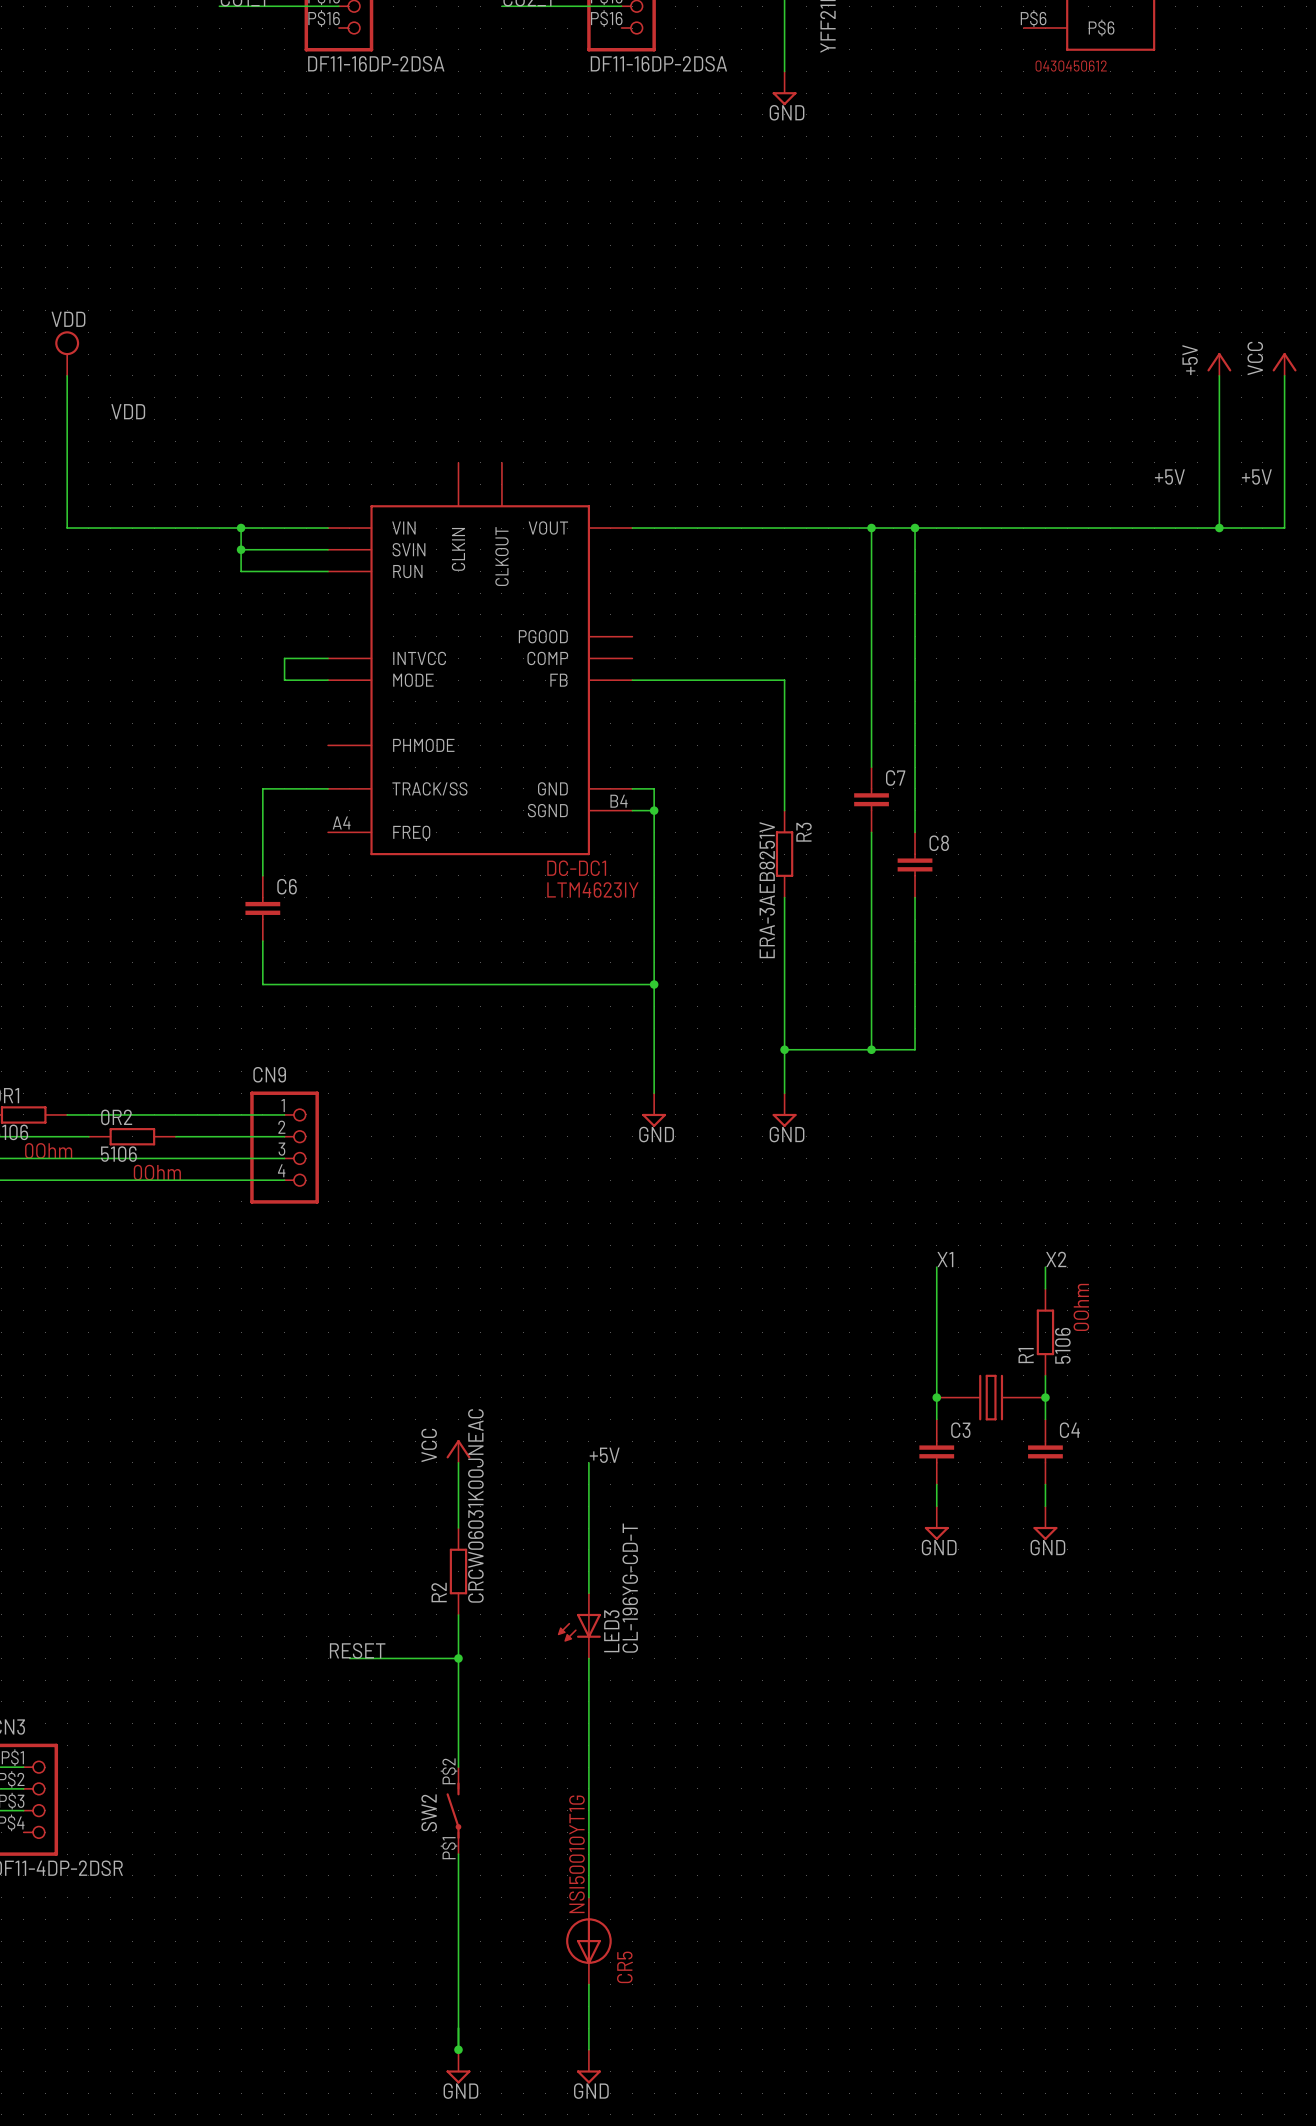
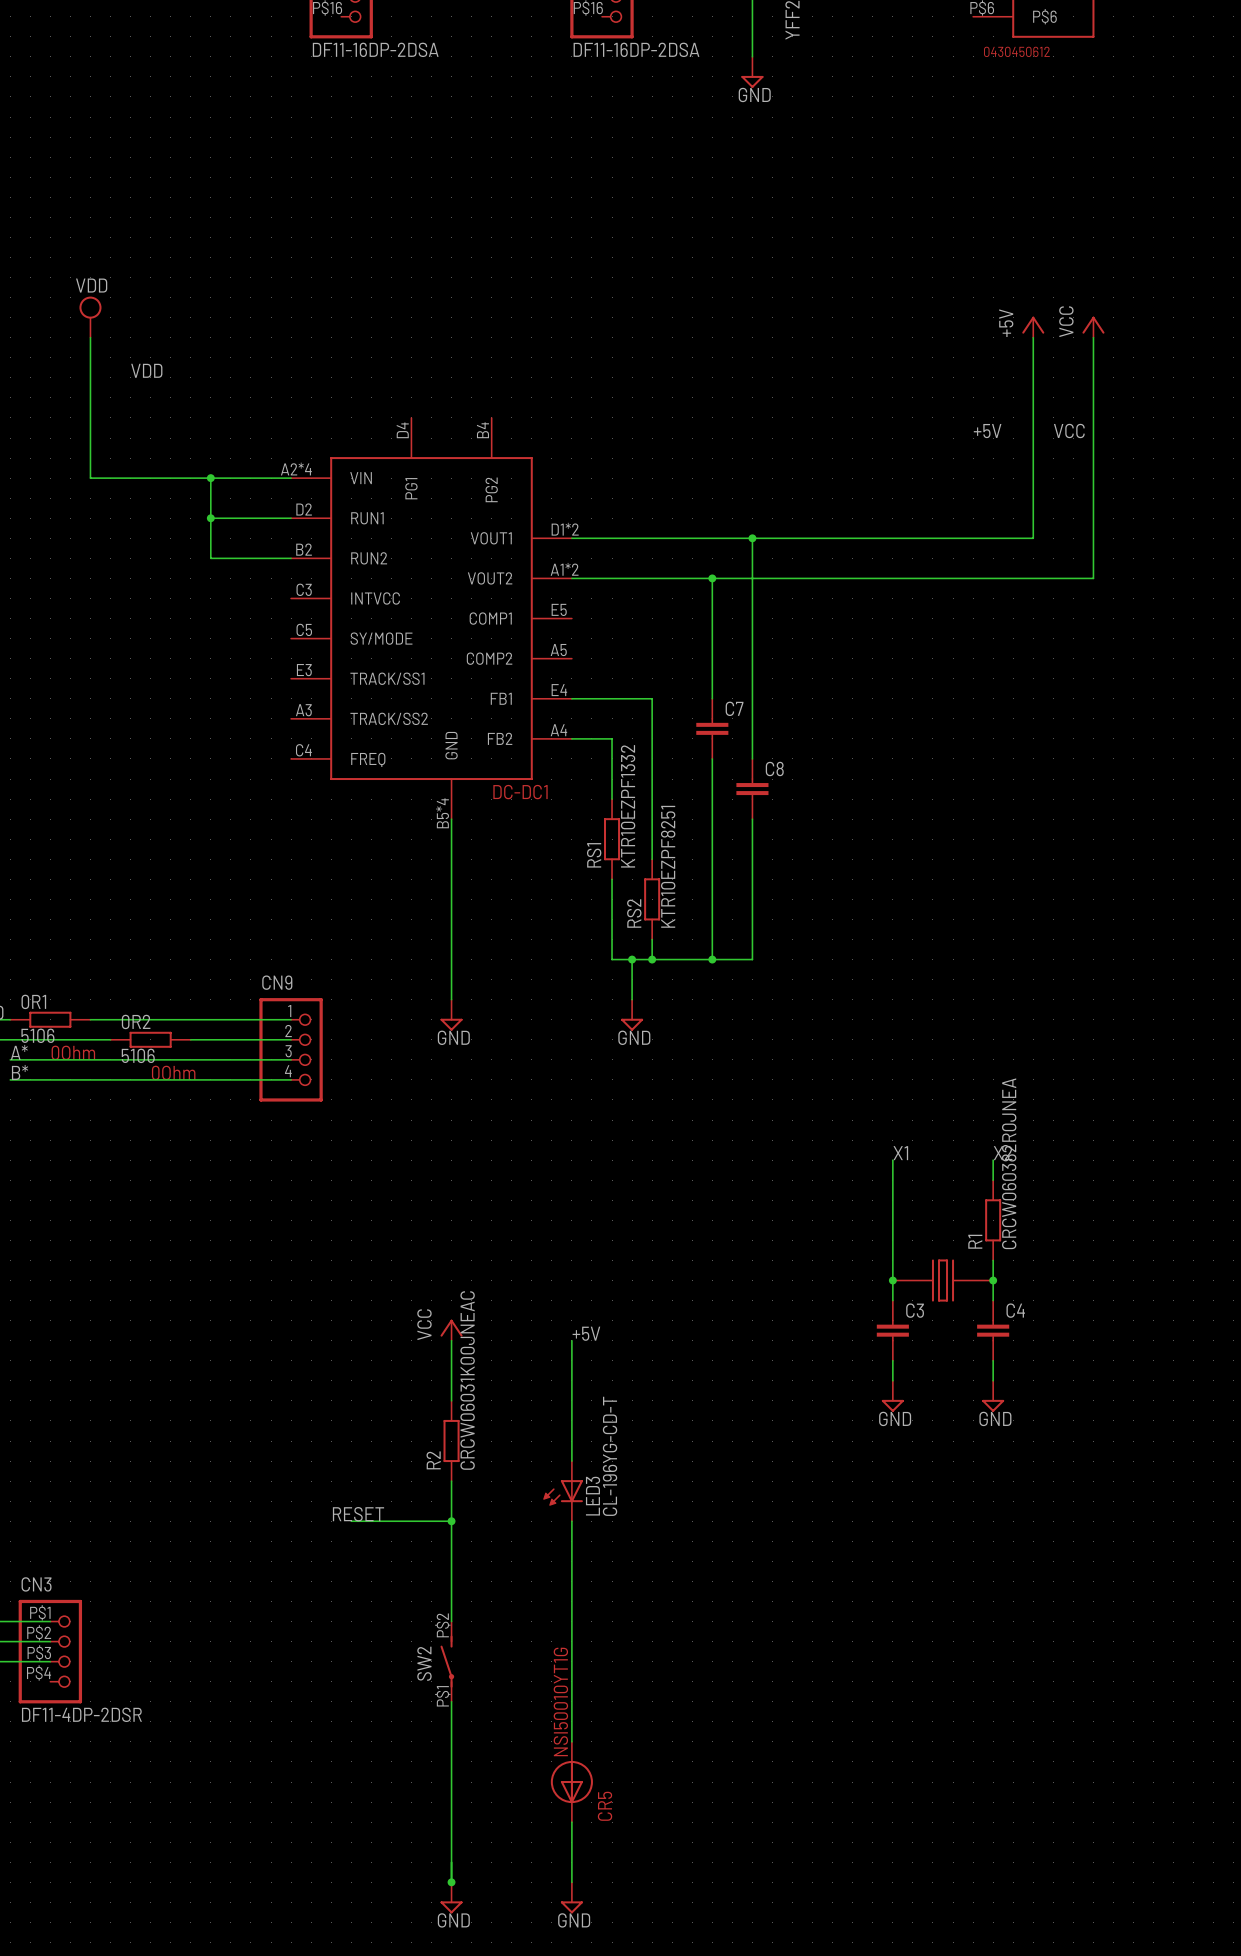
power symbol position: +5V (1219, 364) -> +5V (1033, 327)
power symbol position: VCC (1284, 364) -> VCC (1093, 327)
wire: none -> (1033, 337) (1033, 538) (571, 538)
wire: none -> (1093, 337) (1093, 578) (571, 578)
wire: (1219, 375) (1219, 528) -> none
wire: (1284, 375) (1284, 528) (632, 528) -> none
DC-DC1 symbol: [328, 462, 633, 856] -> [291, 417, 572, 820]
label: none -> +5V (987, 431)
label: none -> VCC (1069, 430)
label: +5V (1169, 476) -> none
label: +5V (1256, 476) -> none
wire: none -> (210, 478) (210, 558) (291, 558)
junction: none -> (210, 478)
wire: (241, 528) (241, 571) -> (210, 518) (250, 518)
junction: (241, 528) -> none
wire: (871, 528) (871, 767) -> none
junction: (871, 528) -> none
wire: (915, 528) (915, 832) -> none
junction: (915, 528) -> none
junction: (1219, 528) -> none
wire: (241, 549) (328, 549) -> none
junction: (241, 549) -> none
junction: none -> (210, 518)
junction: none -> (752, 538)
wire: none -> (712, 578) (712, 698)
junction: none -> (712, 578)
wire: (328, 658) (284, 658) (284, 680) (328, 680) -> none
wire: (632, 680) (784, 680) -> (752, 538) (752, 618)
wire: none -> (571, 698) (652, 698) (652, 859)
wire: (328, 788) (262, 788) (262, 875) -> none
wire: (632, 788) (654, 788) (654, 1049) -> none
C7 position: (871, 799) -> (712, 728)
wire: none -> (571, 738) (612, 738) (612, 799)
wire: (632, 810) (654, 810) -> none
junction: (654, 810) -> none
wire: (871, 832) (871, 1049) -> (712, 758) (712, 959)
R3: ERA-3AEB8251V (784, 854) -> none
C8 position: (915, 864) -> (752, 789)
DC-DC1 name position: DC-DC1 (576, 868) -> DC-DC1 (520, 792)
DC-DC1 value: LTM4623IY (592, 889) -> none
wire: none -> (451, 819) (451, 999)
wire: (915, 897) (915, 1049) (784, 1049) (784, 1093) -> none
C6: (262, 908) -> none
RS1: none -> KTR10EZPF1332 (612, 839)
wire: (262, 941) (262, 984) (654, 984) -> none
wire: none -> (612, 879) (612, 959) (752, 959)
junction: (654, 984) -> none
RS2: none -> KTR10EZPF8251 (652, 899)
wire: none -> (652, 939) (652, 959)
junction: none -> (632, 959)
junction: none -> (652, 959)
junction position: (784, 1049) -> (712, 959)
junction: (871, 1049) -> none
power symbol: none -> GND (451, 1015)
power symbol: GND (784, 1110) -> none
R1 text: 0Ohm (1081, 1307) -> none
R1 value: 5106 (1062, 1345) -> CRCW060382R0JNEA (1009, 1163)

